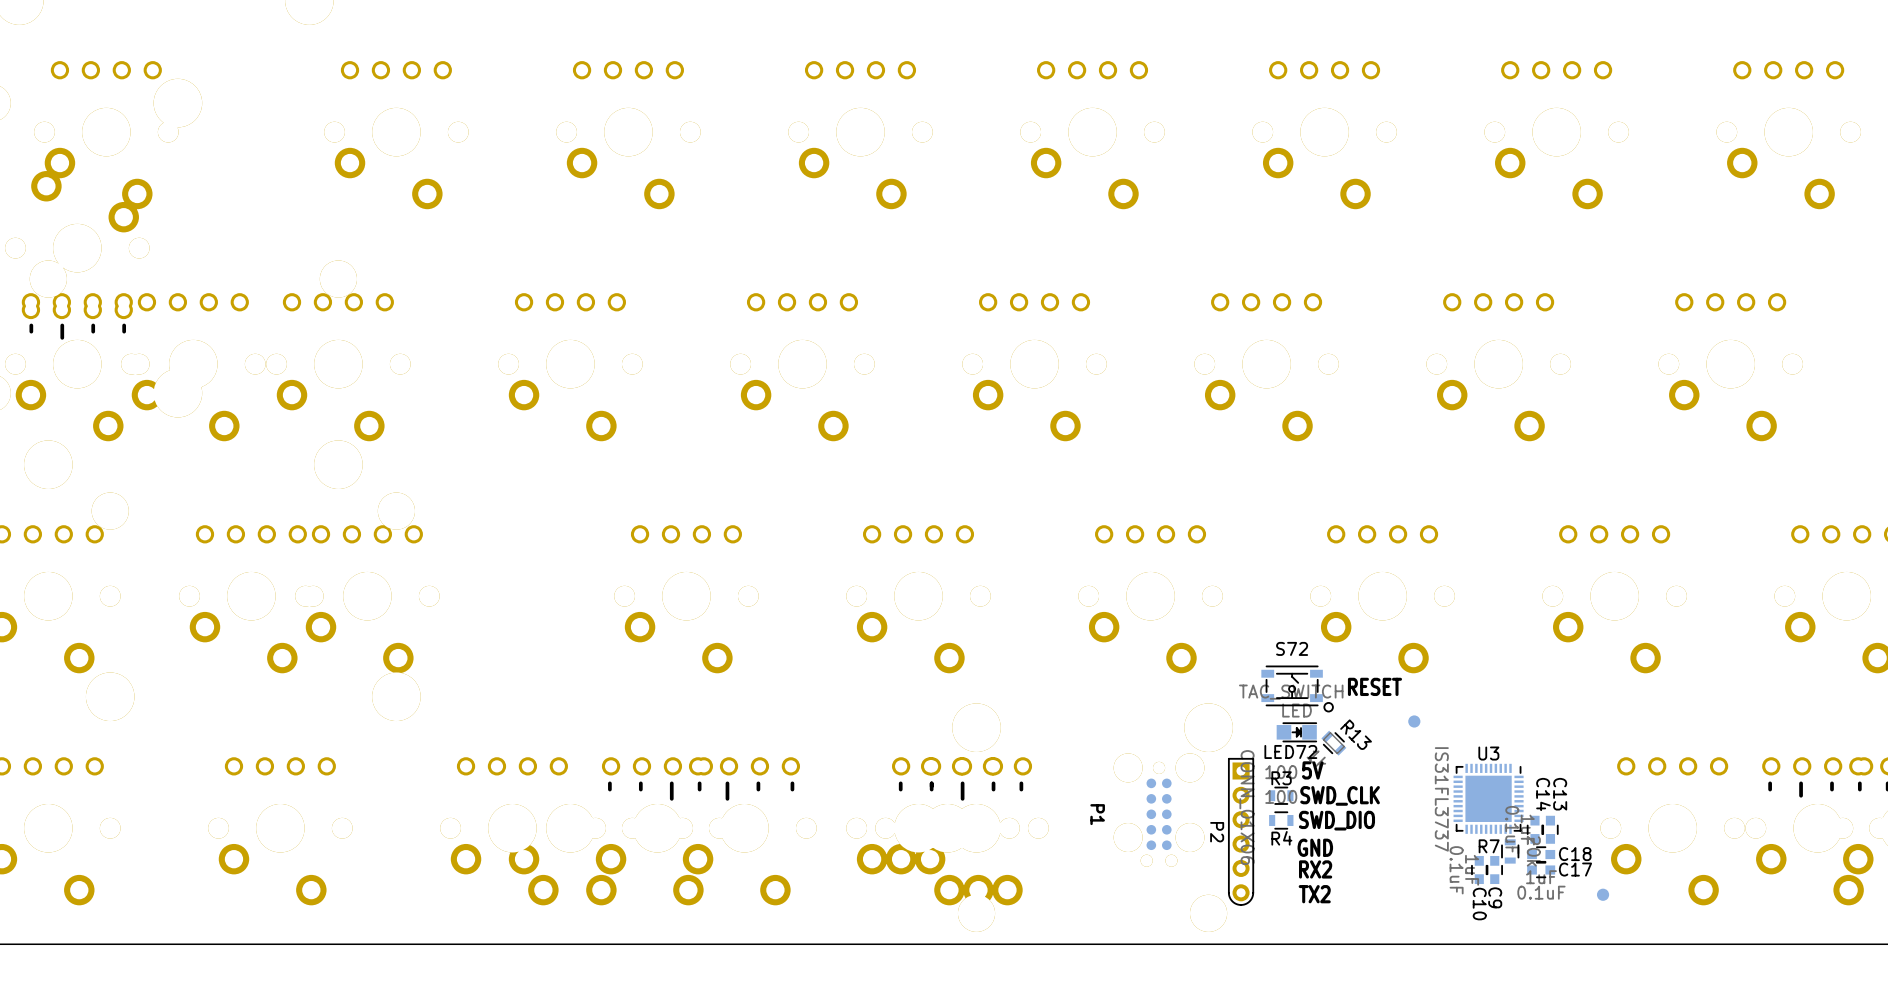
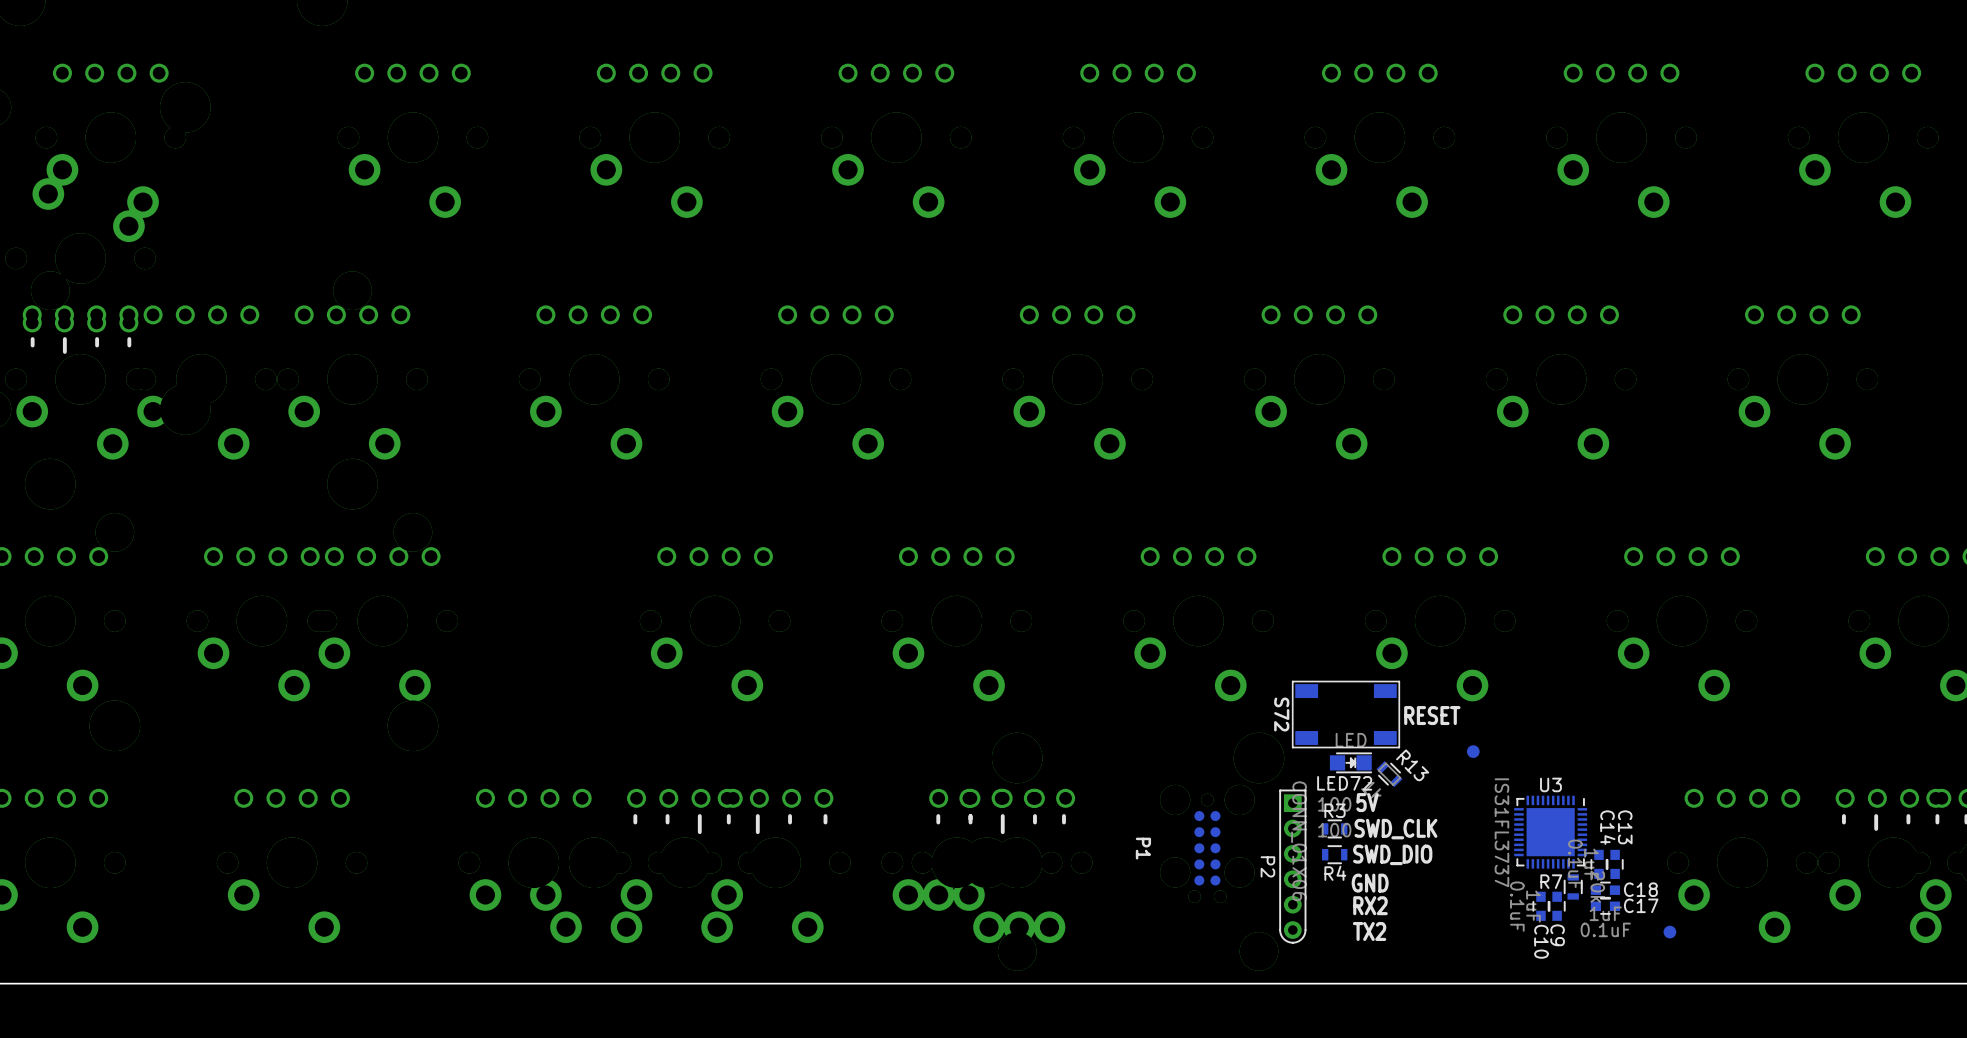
S72 name position: S72 (1292, 648) -> S72 (1281, 714)
S72 footprint: [1261, 665, 1334, 713] -> [1291, 680, 1401, 749]
S72 value: TAC_SWITCH (1291, 692) -> none

